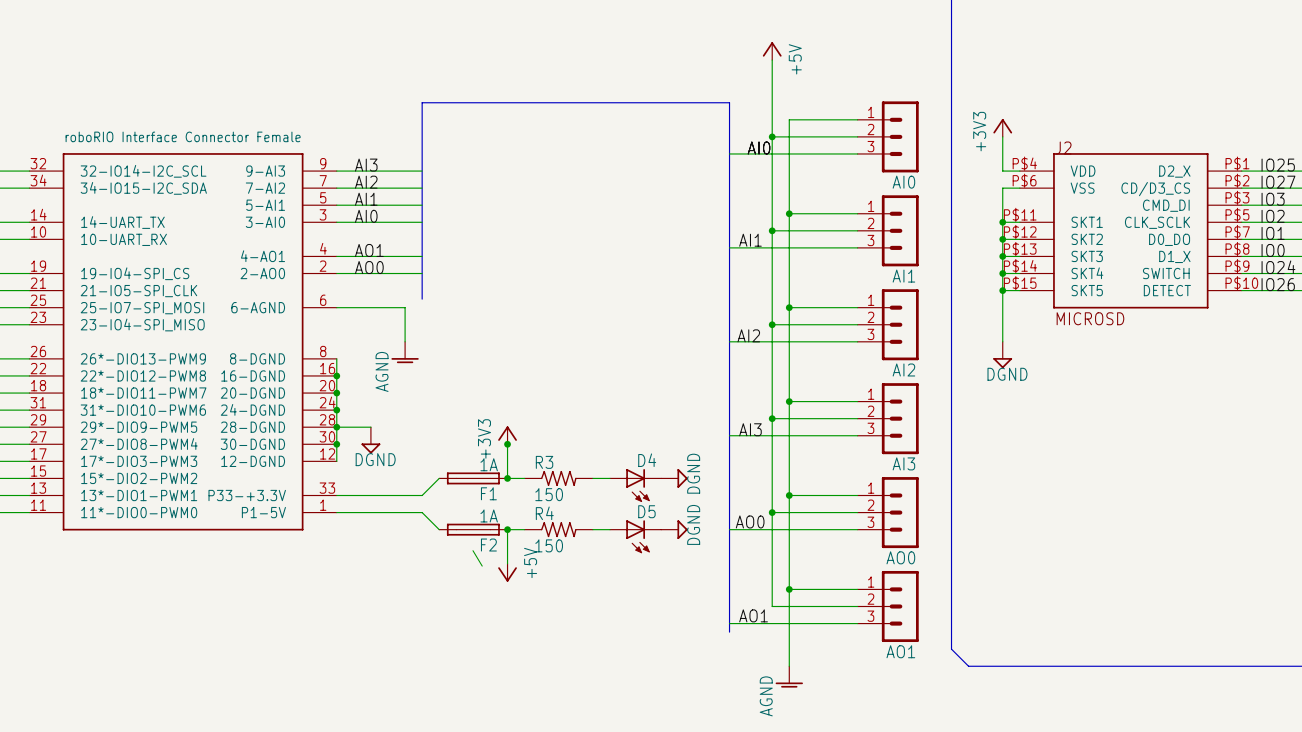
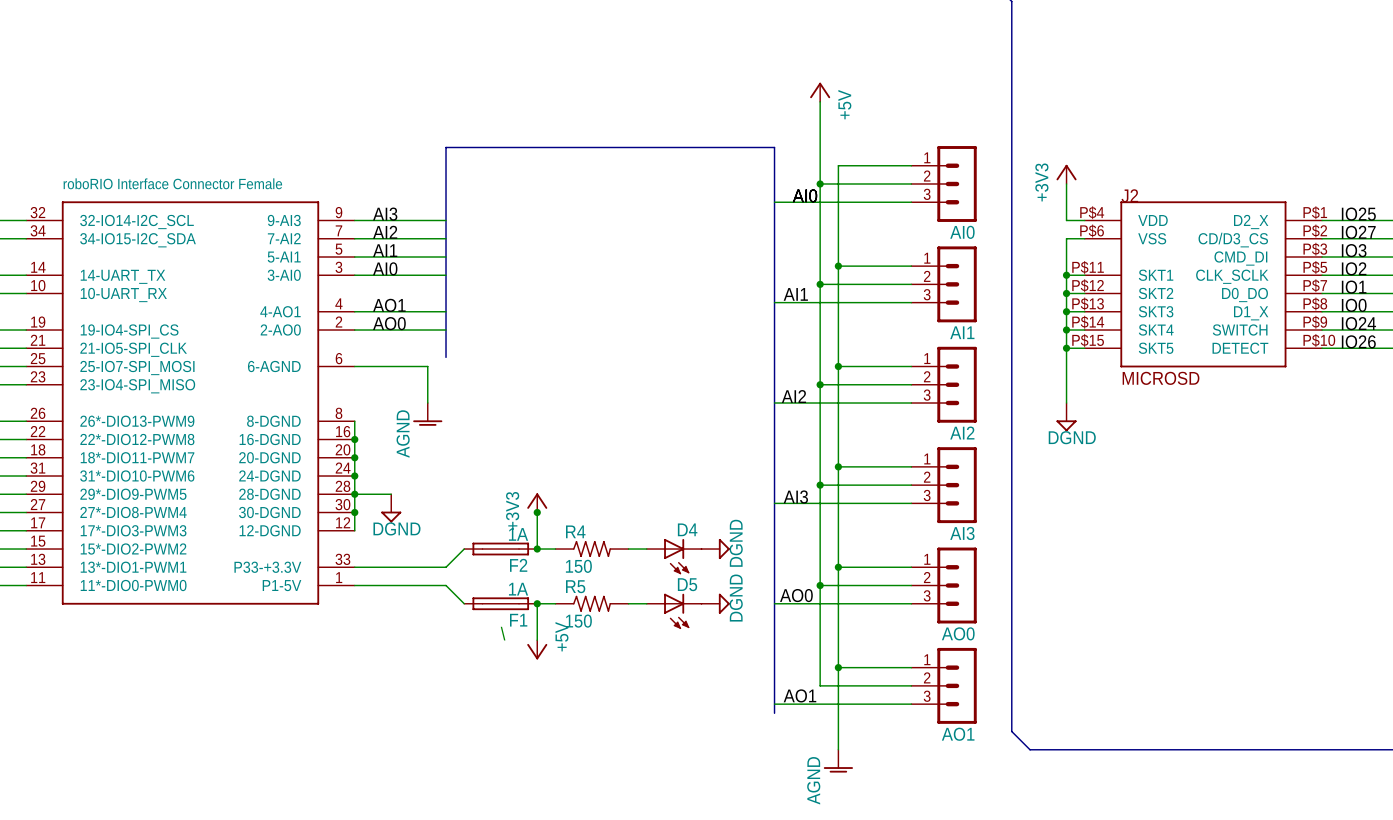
R3 name: R3 (544, 462) -> R4 (575, 531)
F1 name: F1 (488, 493) -> F2 (518, 565)
R4 name: R4 (544, 513) -> R5 (575, 586)
F2 name: F2 (488, 545) -> F1 (518, 620)

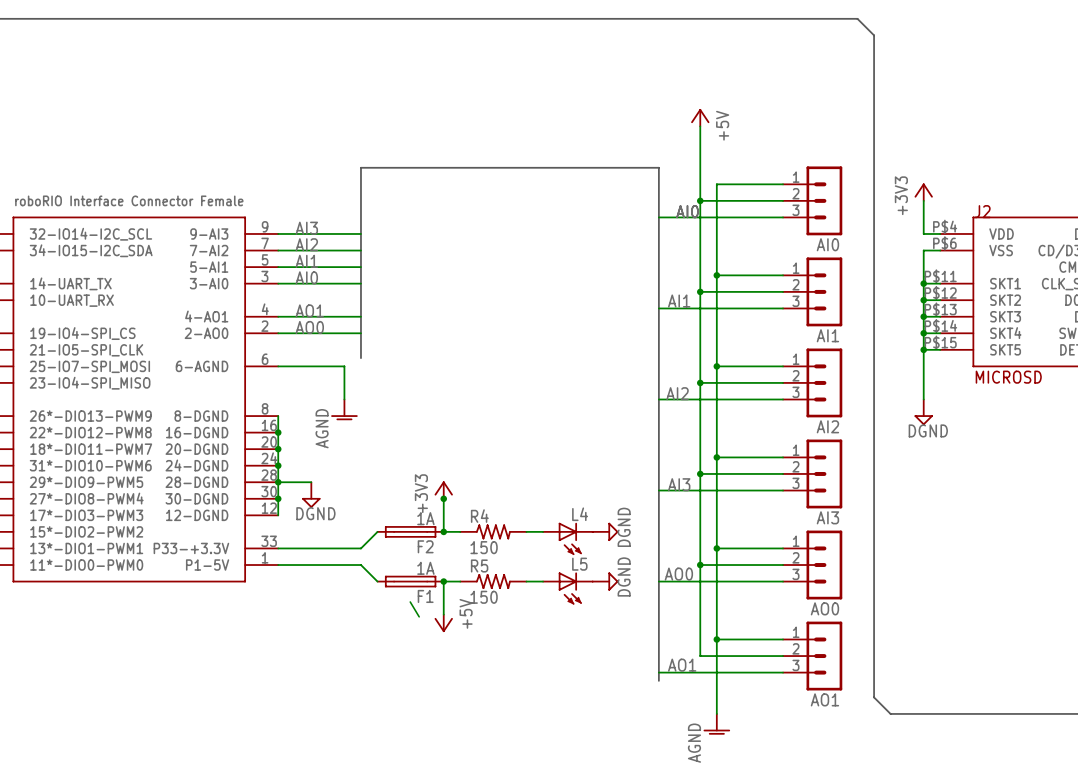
D4 name: D4 (687, 529) -> L4 (580, 514)
D5 name: D5 (687, 584) -> L5 (579, 564)

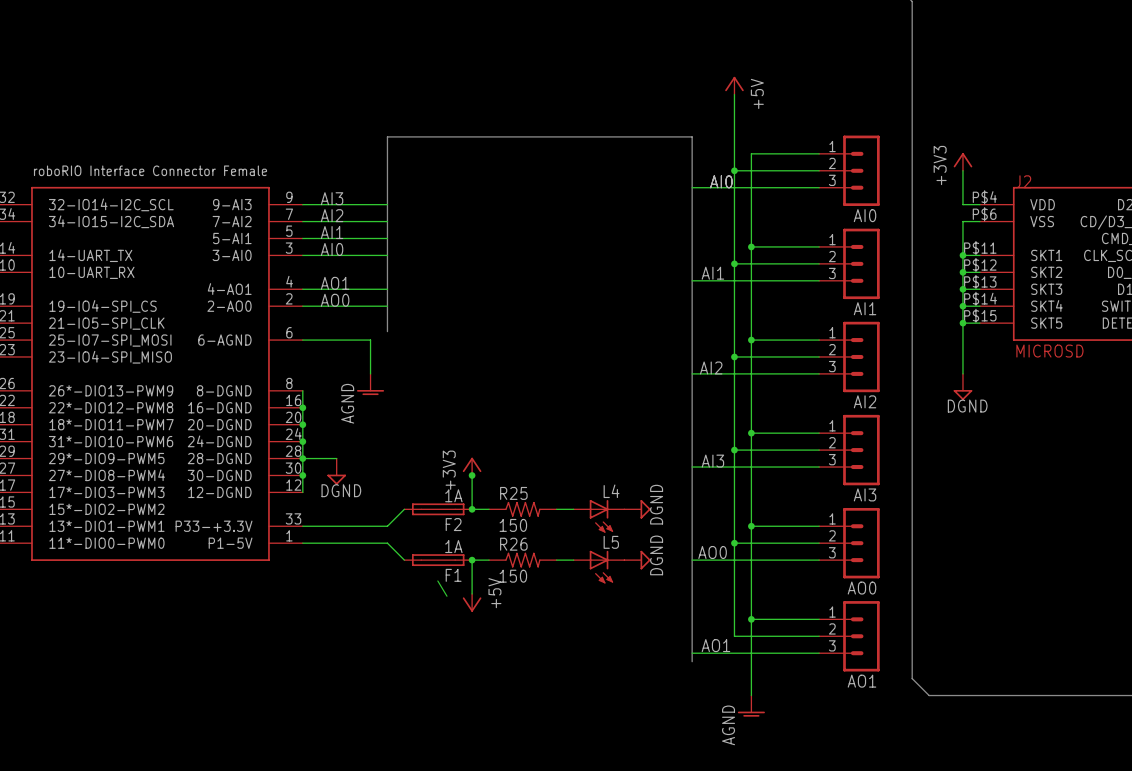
R4 name: R4 (479, 516) -> R25 (513, 493)
R5 name: R5 (479, 566) -> R26 (513, 544)

